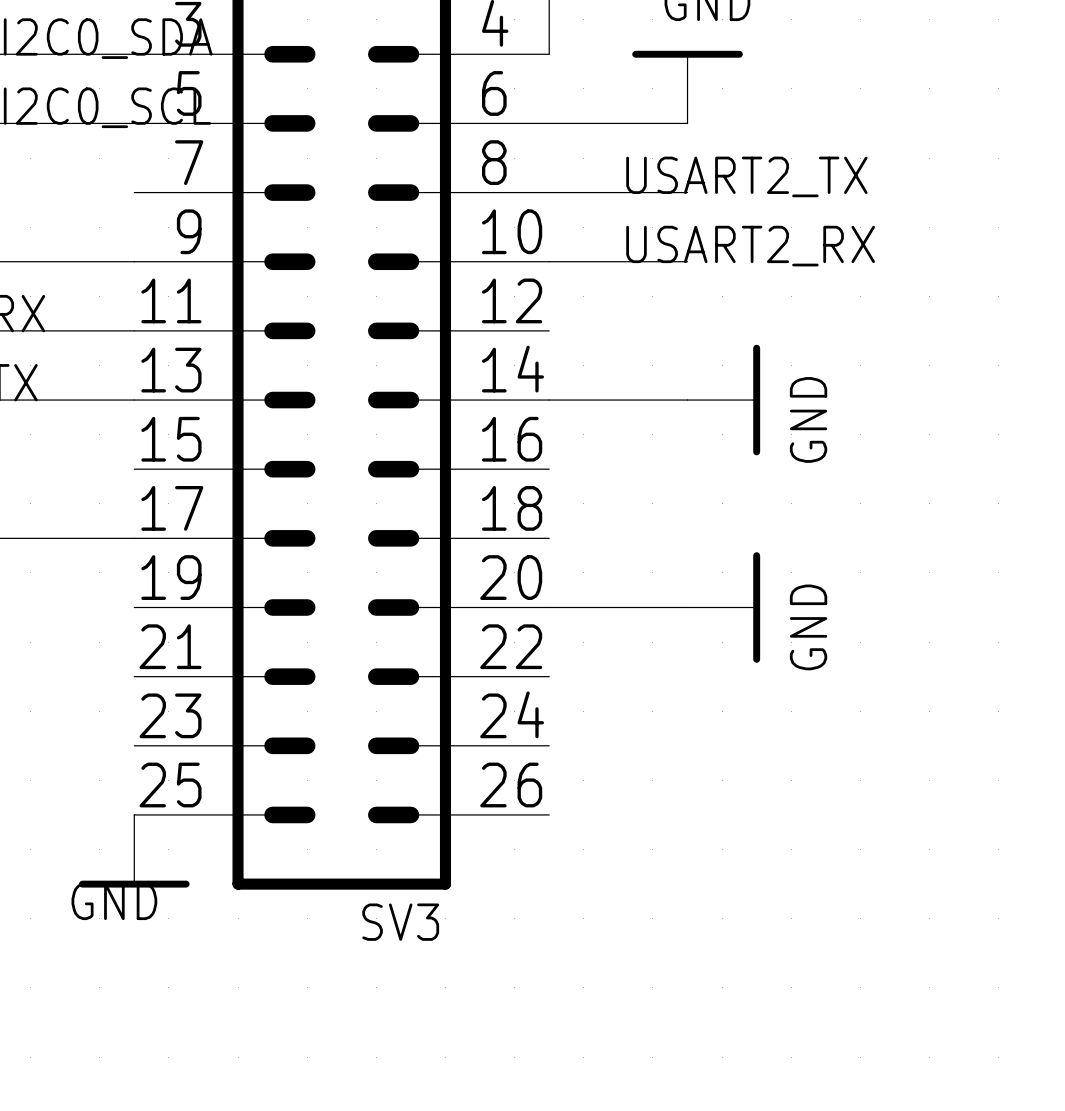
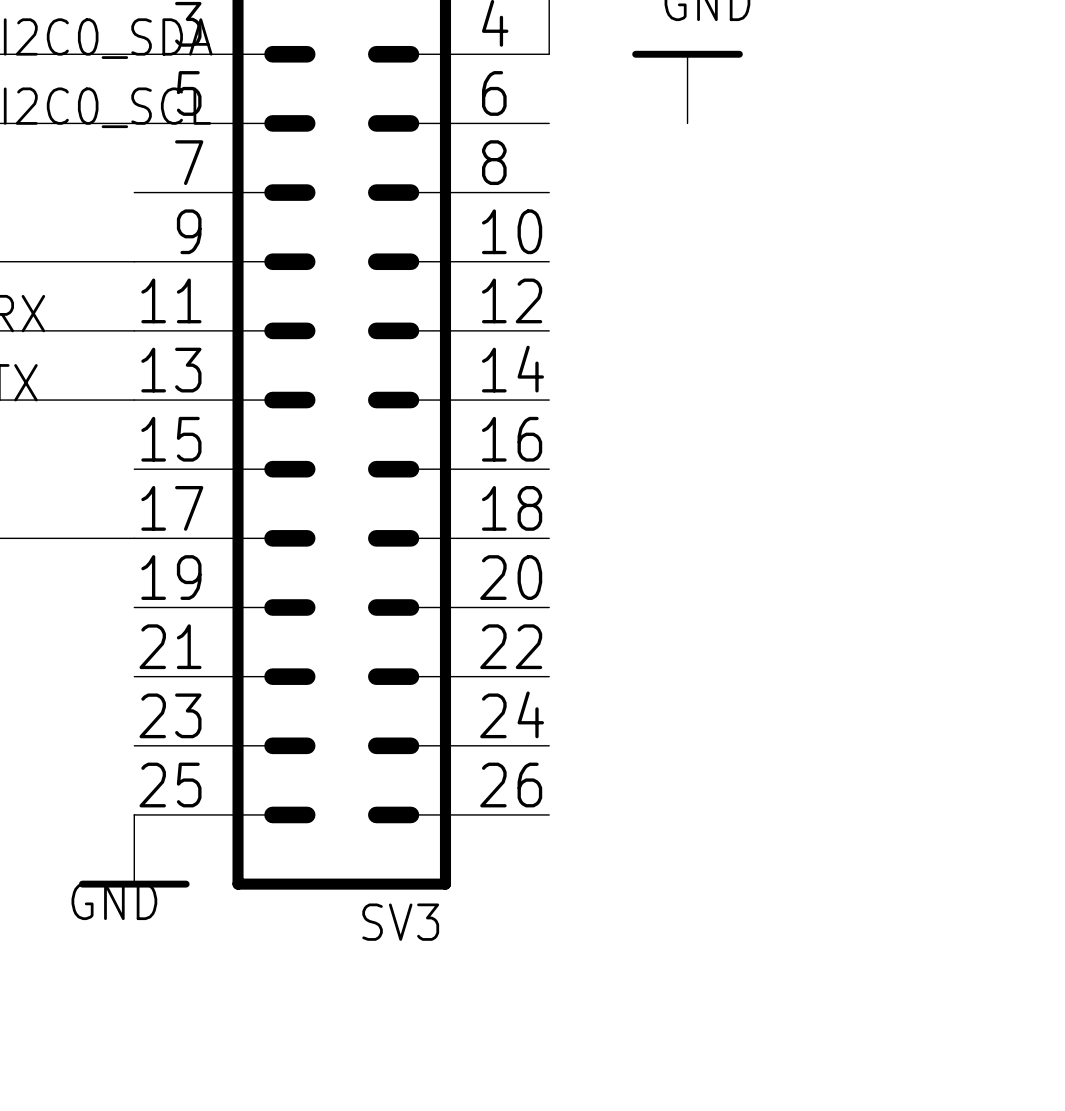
wire: (549, 123) (687, 123) -> none
label: USART2_TX (746, 176) -> none
wire: (549, 192) (687, 192) -> none
label: USART2_RX (750, 246) -> none
wire: (549, 261) (687, 261) -> none
wire: (549, 400) (687, 400) -> none
power symbol: GND (723, 400) -> none
wire: (549, 607) (687, 607) -> none
power symbol: GND (723, 607) -> none

